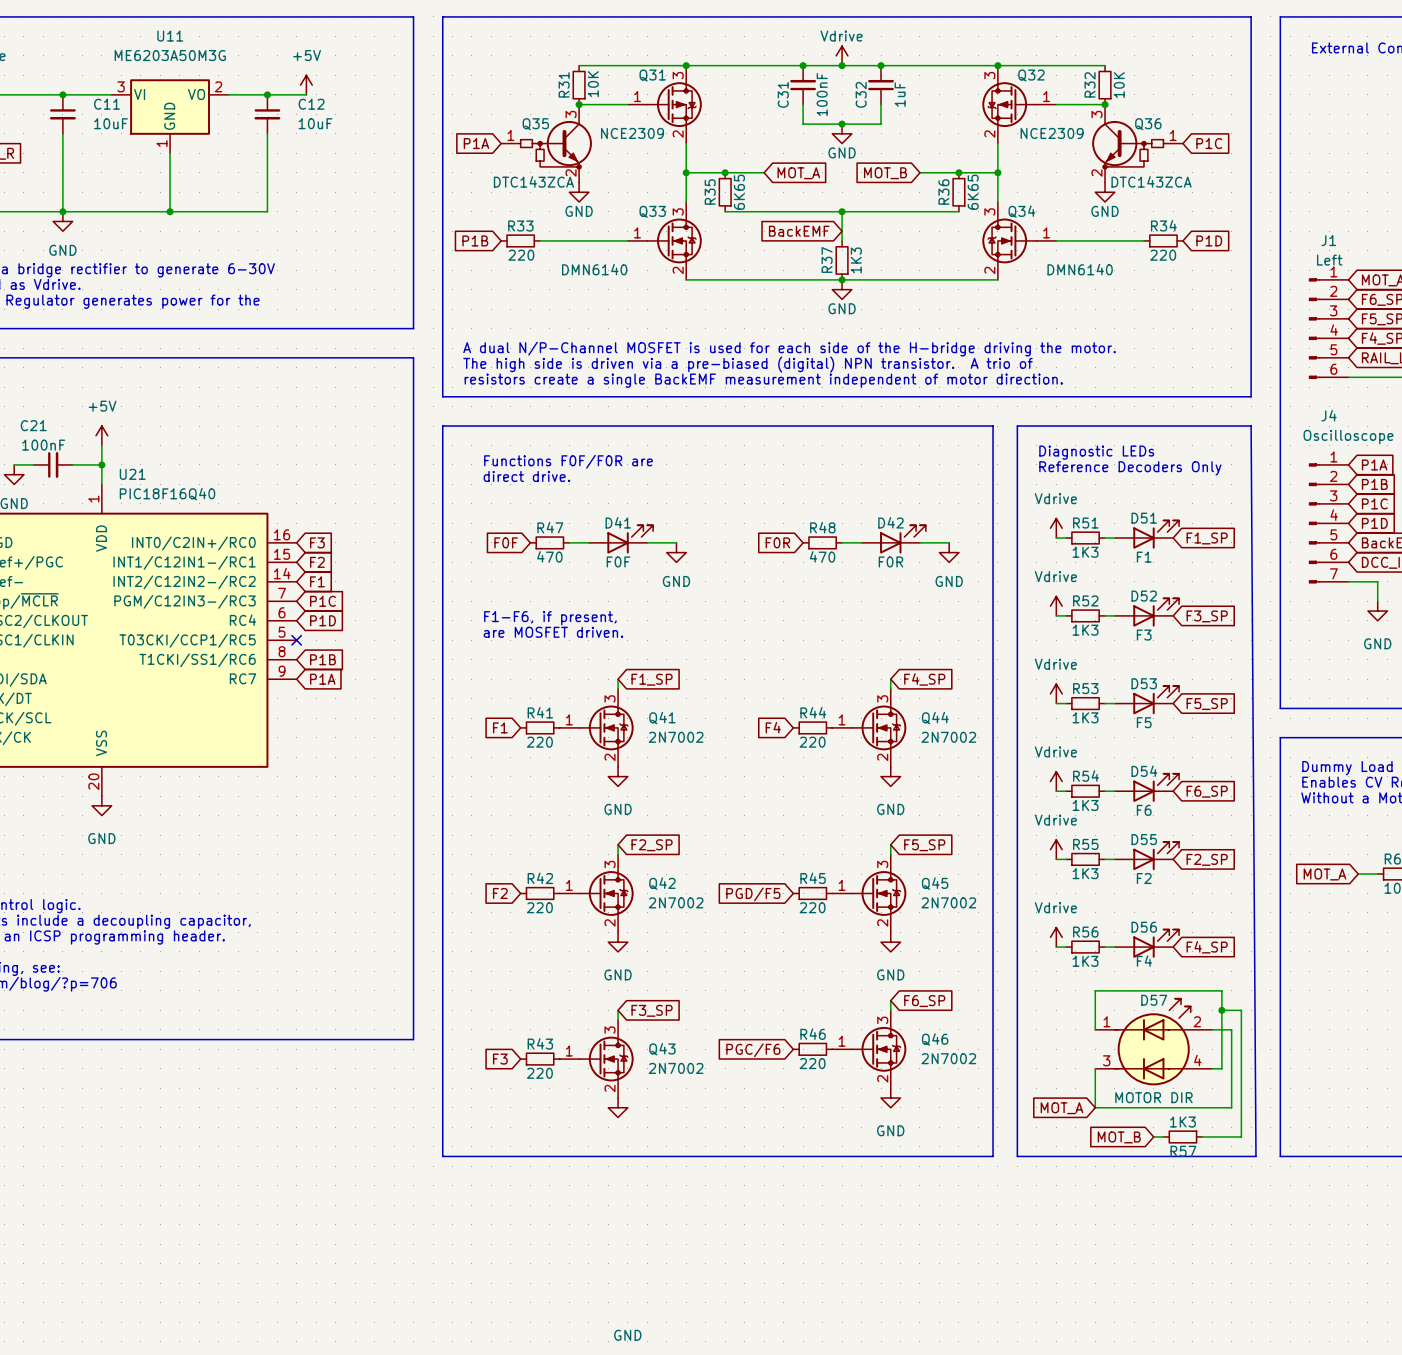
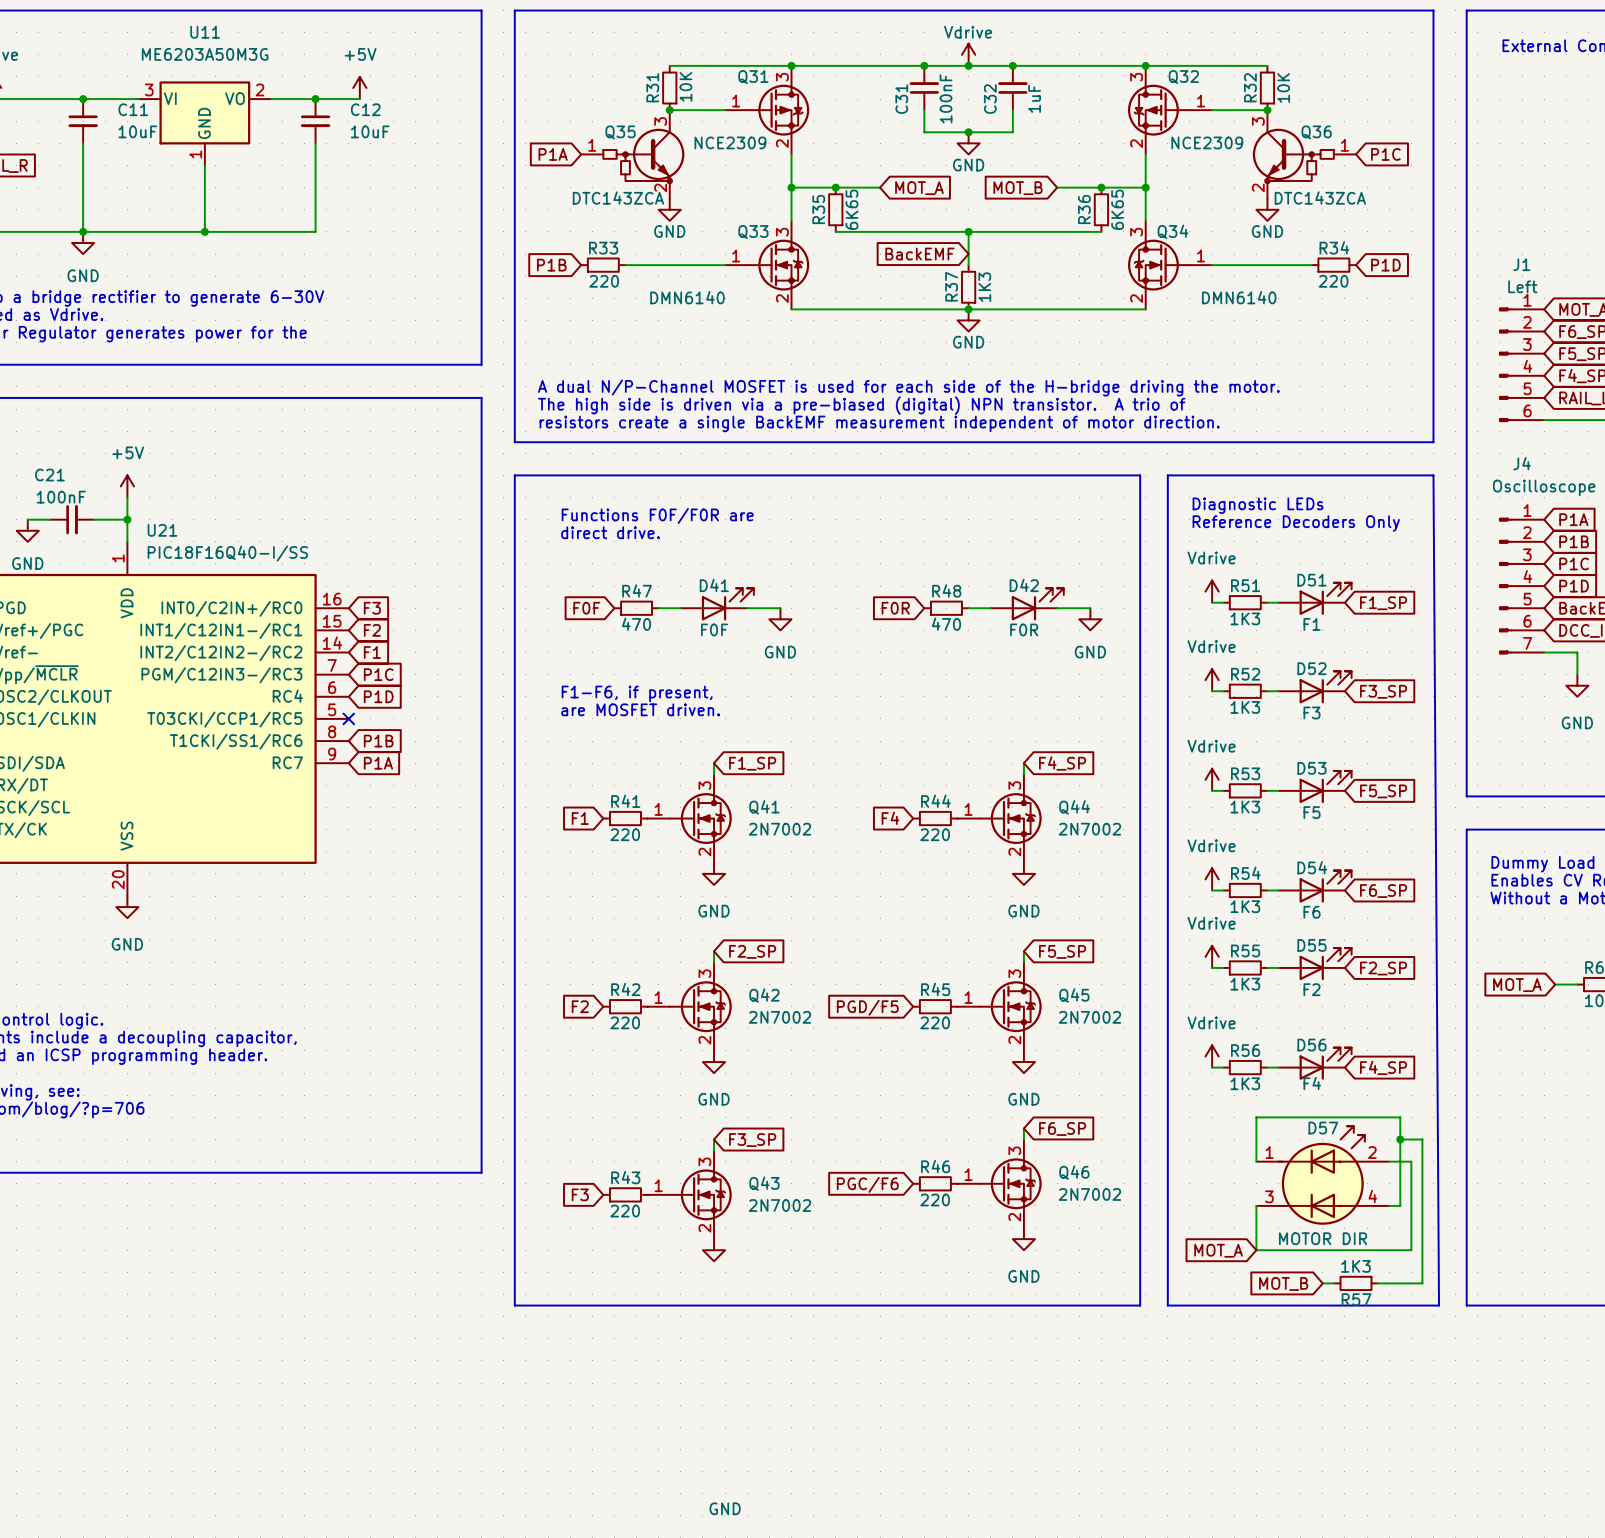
U21 value: PIC18F16Q40 (167, 494) -> PIC18F16Q40-I/SS (227, 553)

